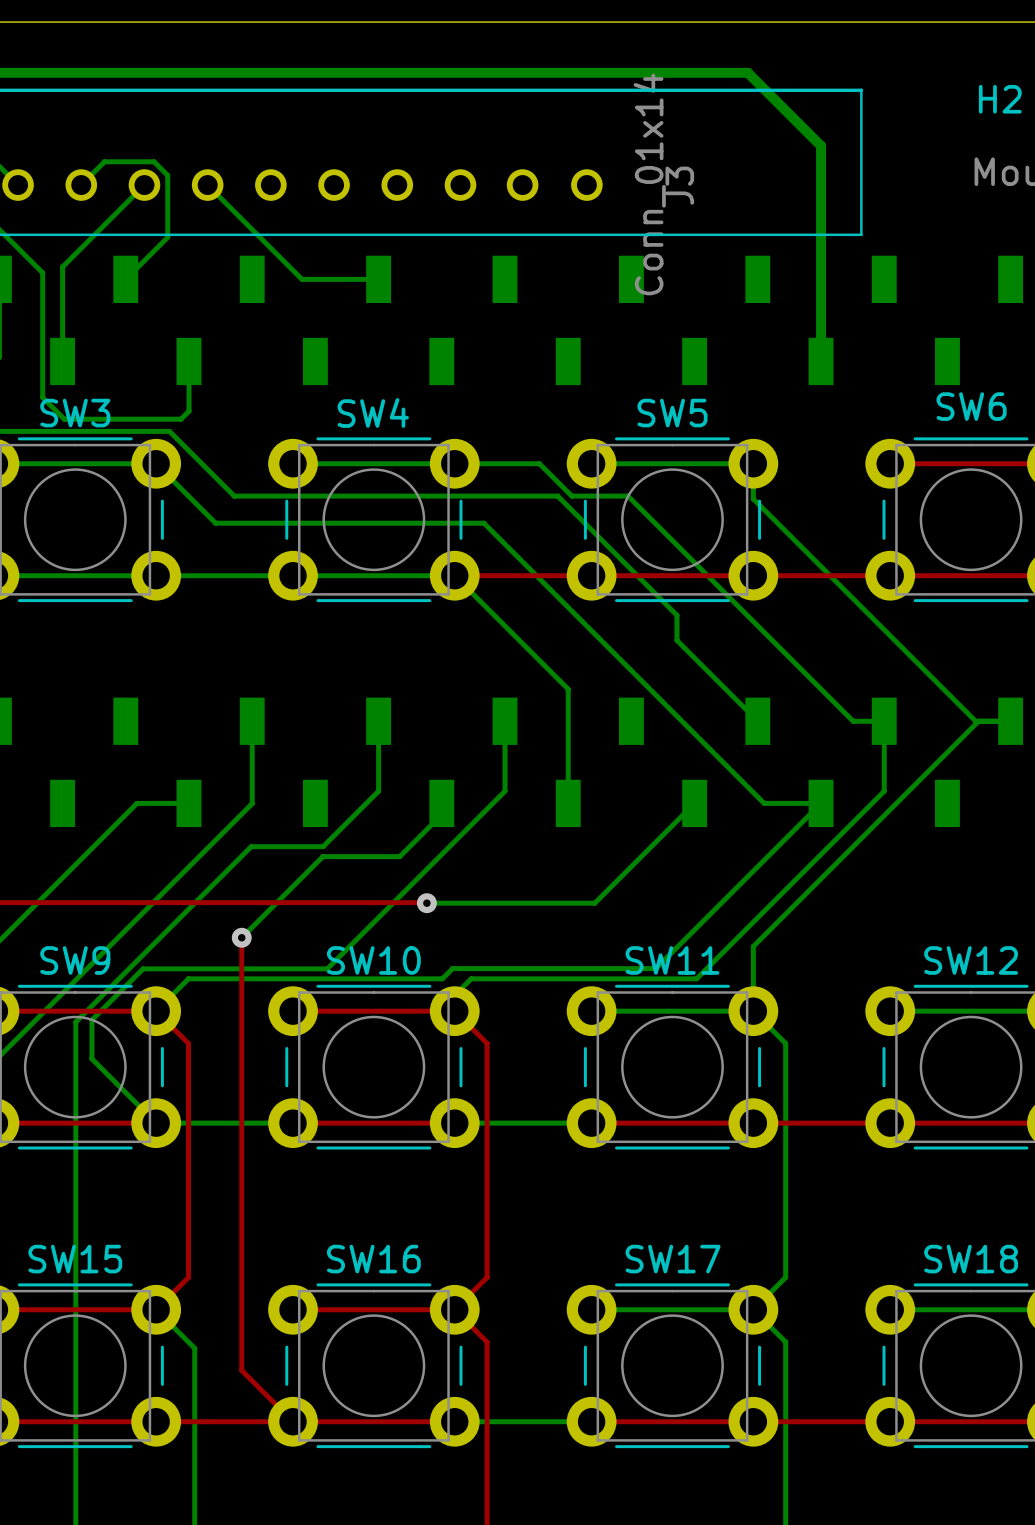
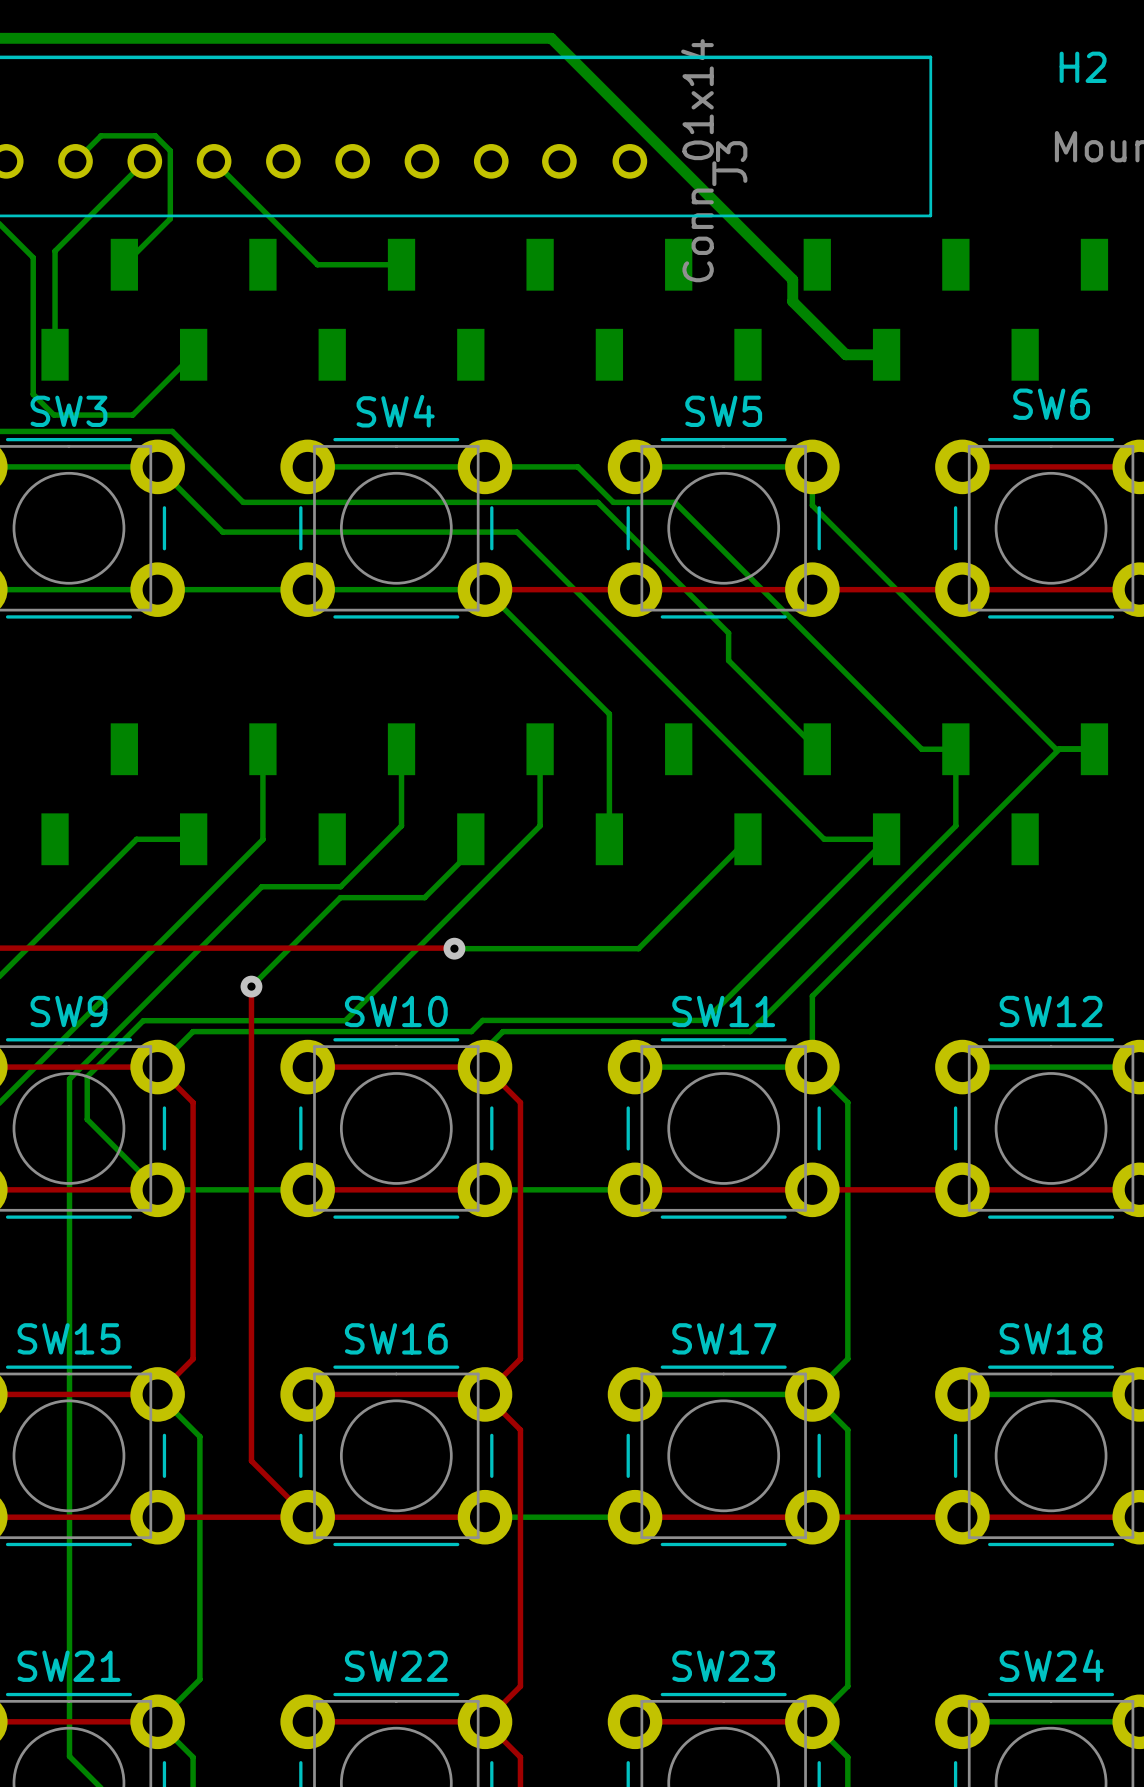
bottom track: (515, 72) (747, 72) (821, 145) (821, 361) -> (551, 38) (792, 279) (792, 301) (845, 354) (886, 354)
bottom track: (189, 361) (189, 411) (181, 419) (64, 419) (61, 416) -> (193, 354) (132, 415) (53, 415)

